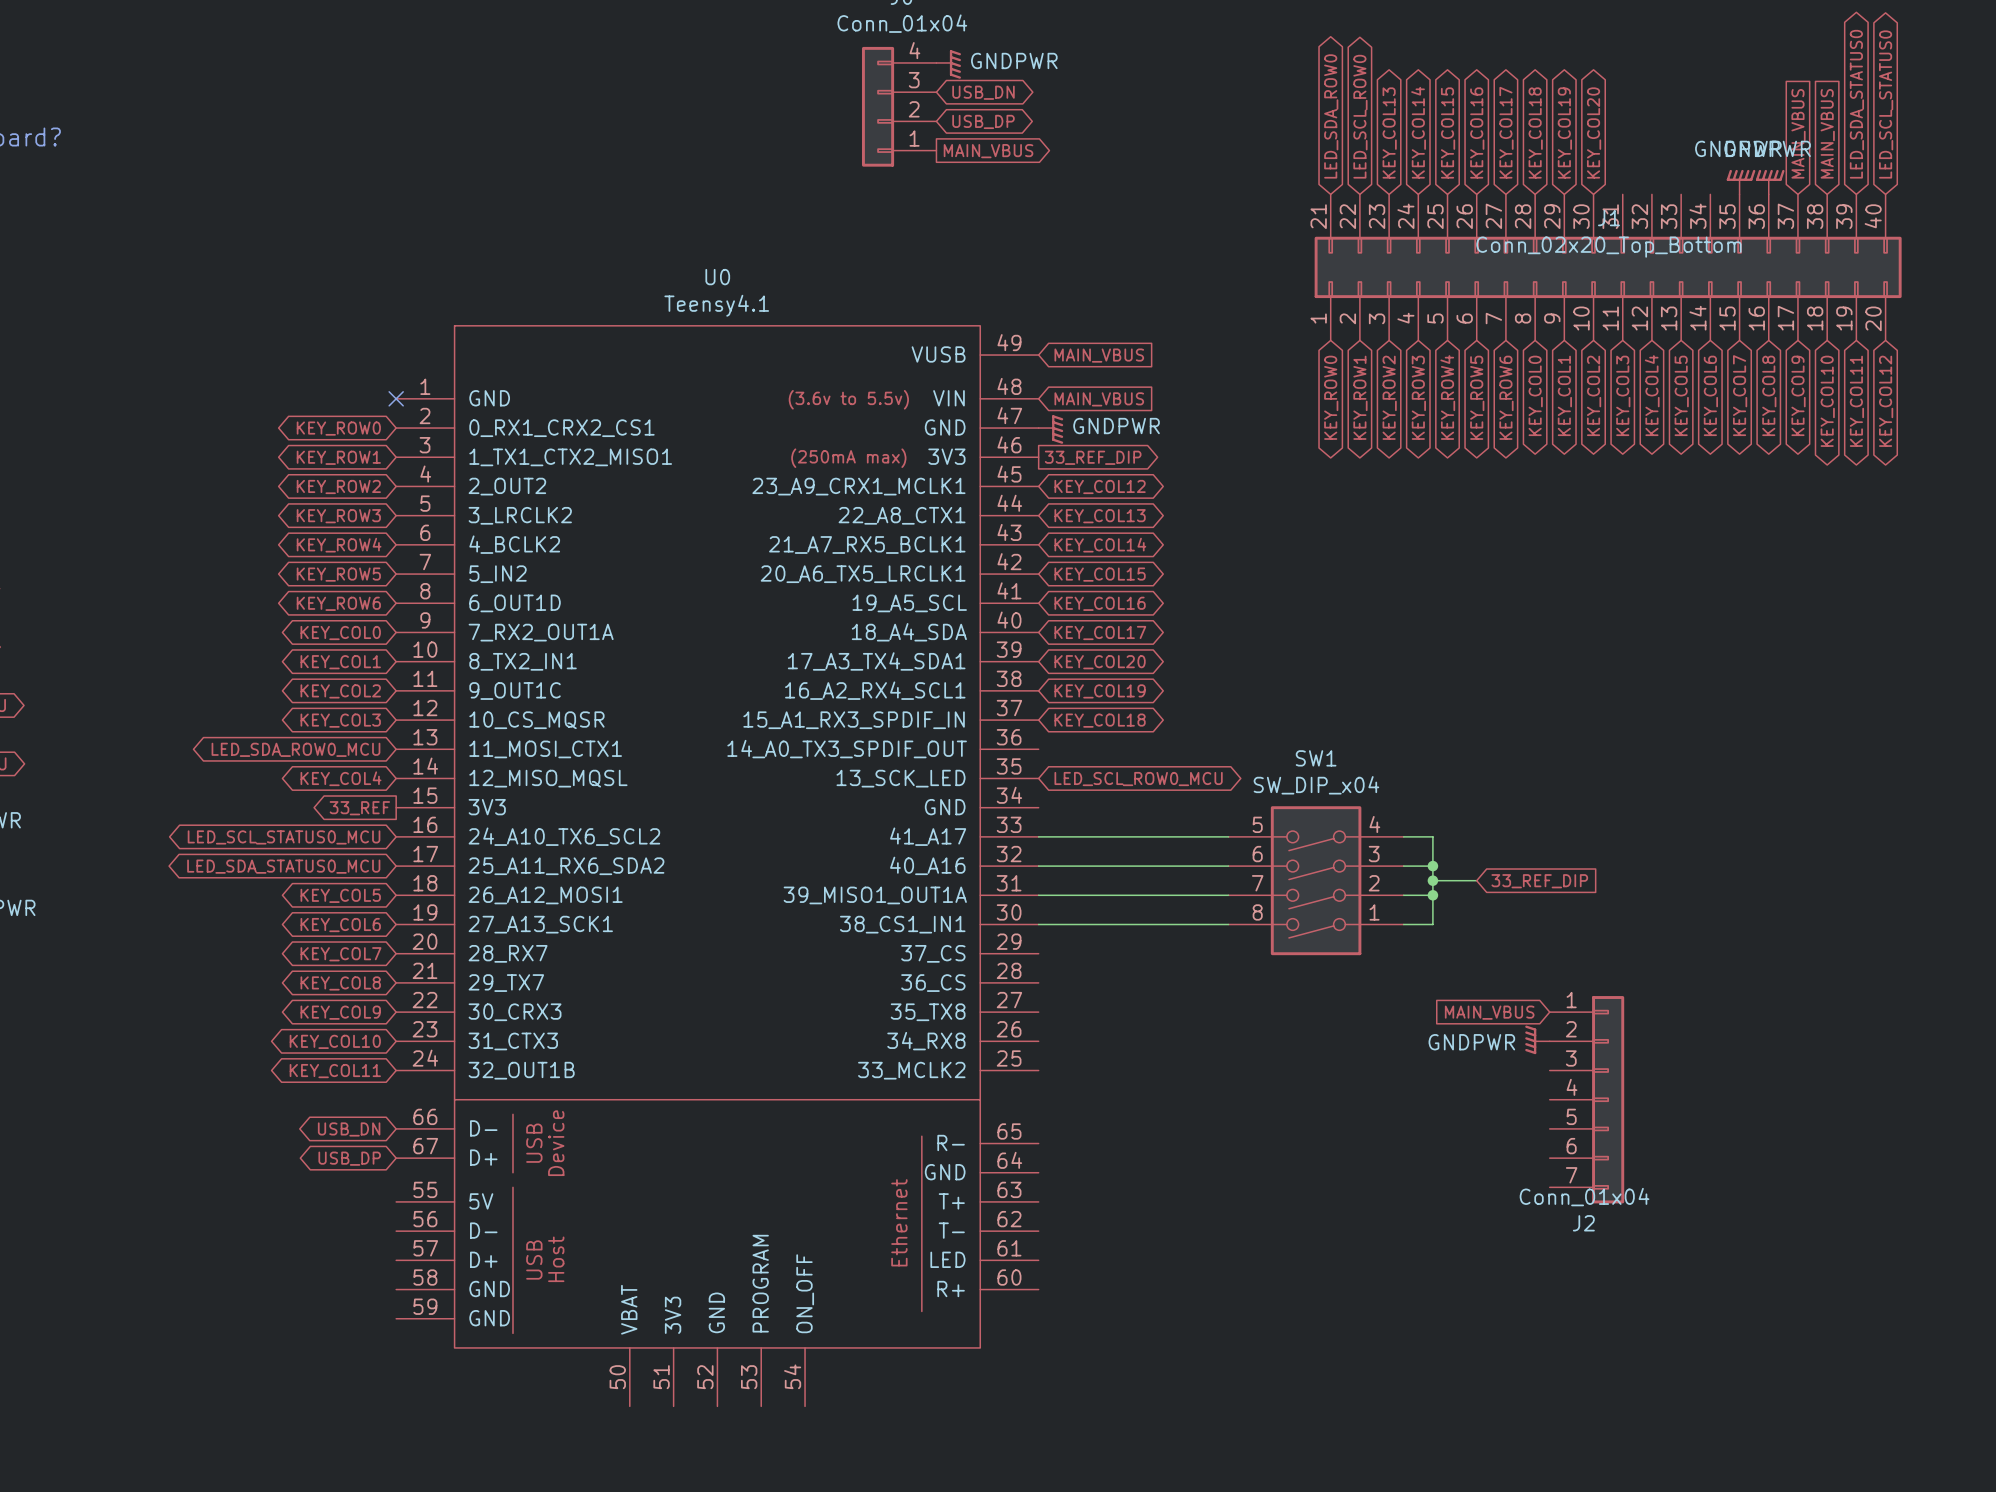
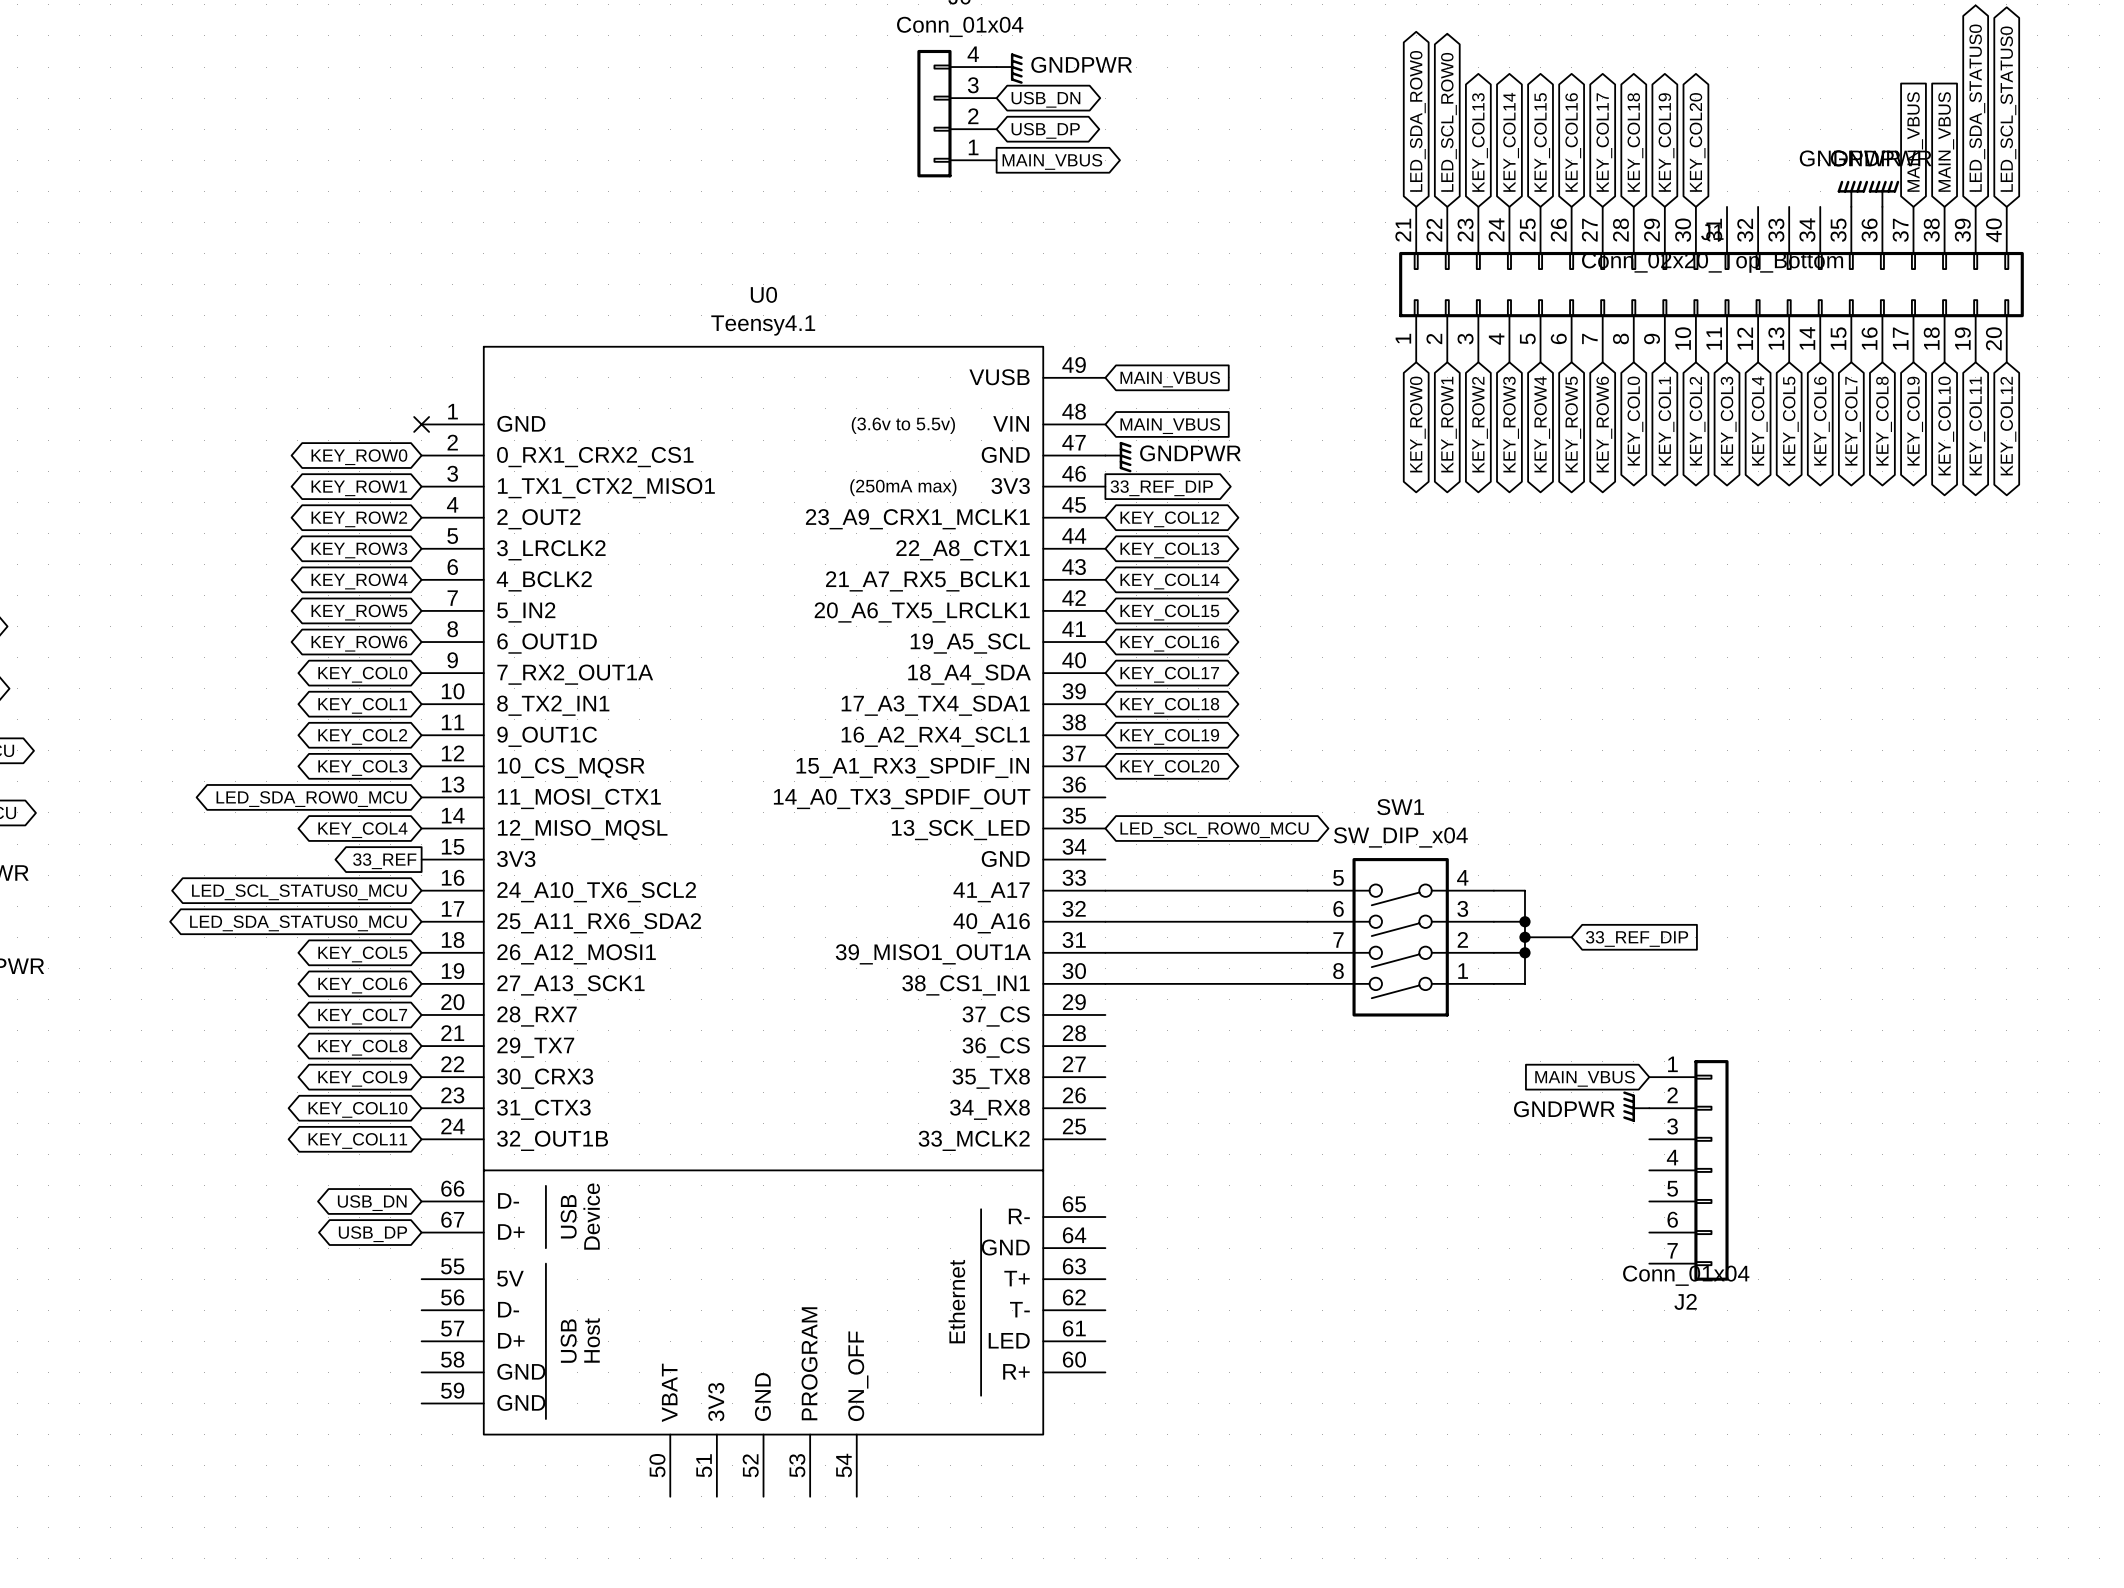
global label: KEY_COL20 (1100, 662) -> KEY_COL18 (1169, 705)
global label: KEY_COL18 (1100, 720) -> KEY_COL20 (1169, 768)

